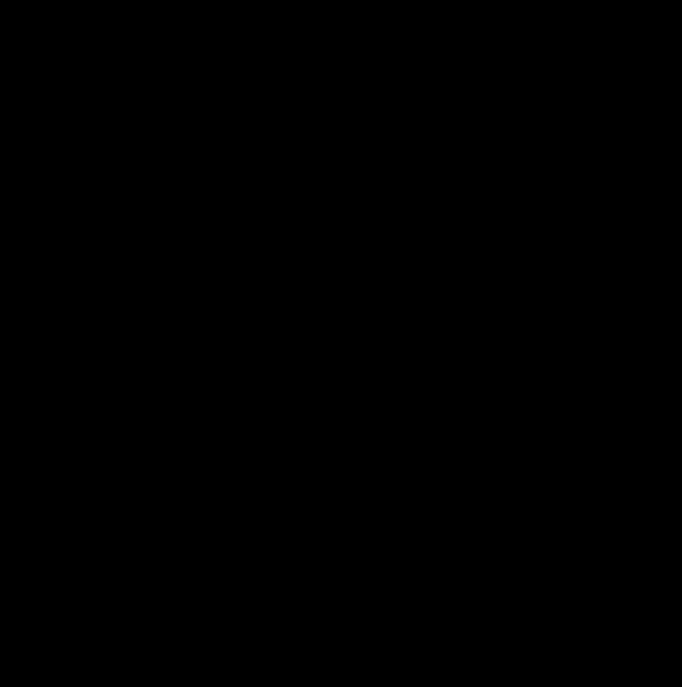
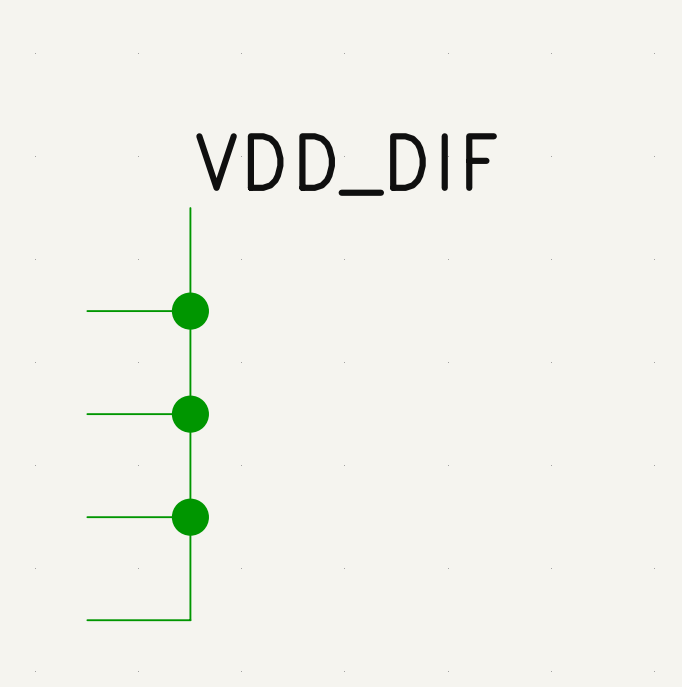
label: none -> VDD_DIF (346, 164)
wire: none -> (190, 208) (190, 620) (87, 620)
wire: none -> (87, 311) (190, 311)
junction: none -> (190, 311)
wire: none -> (87, 414) (190, 414)
junction: none -> (190, 414)
wire: none -> (87, 517) (190, 517)
junction: none -> (190, 517)

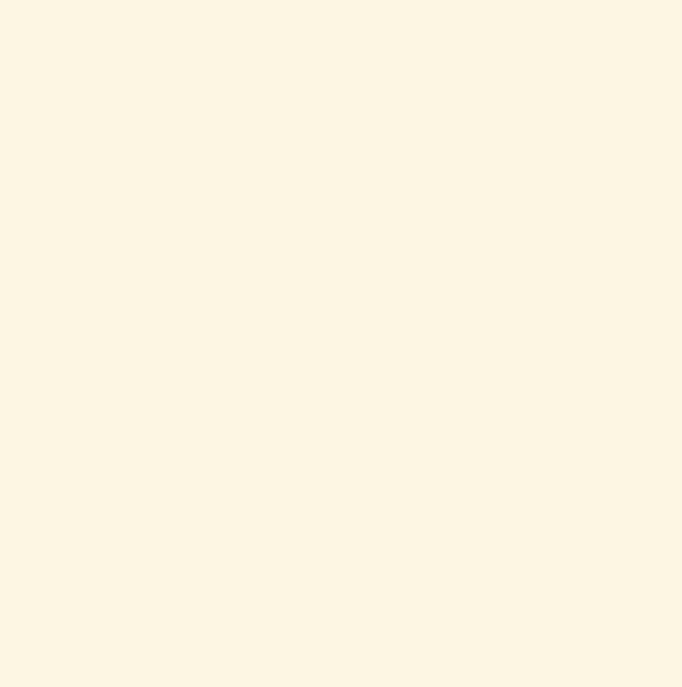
label: VDD_DIF (346, 164) -> none
wire: (190, 208) (190, 620) (87, 620) -> none
wire: (87, 311) (190, 311) -> none
junction: (190, 311) -> none
wire: (87, 414) (190, 414) -> none
junction: (190, 414) -> none
wire: (87, 517) (190, 517) -> none
junction: (190, 517) -> none

